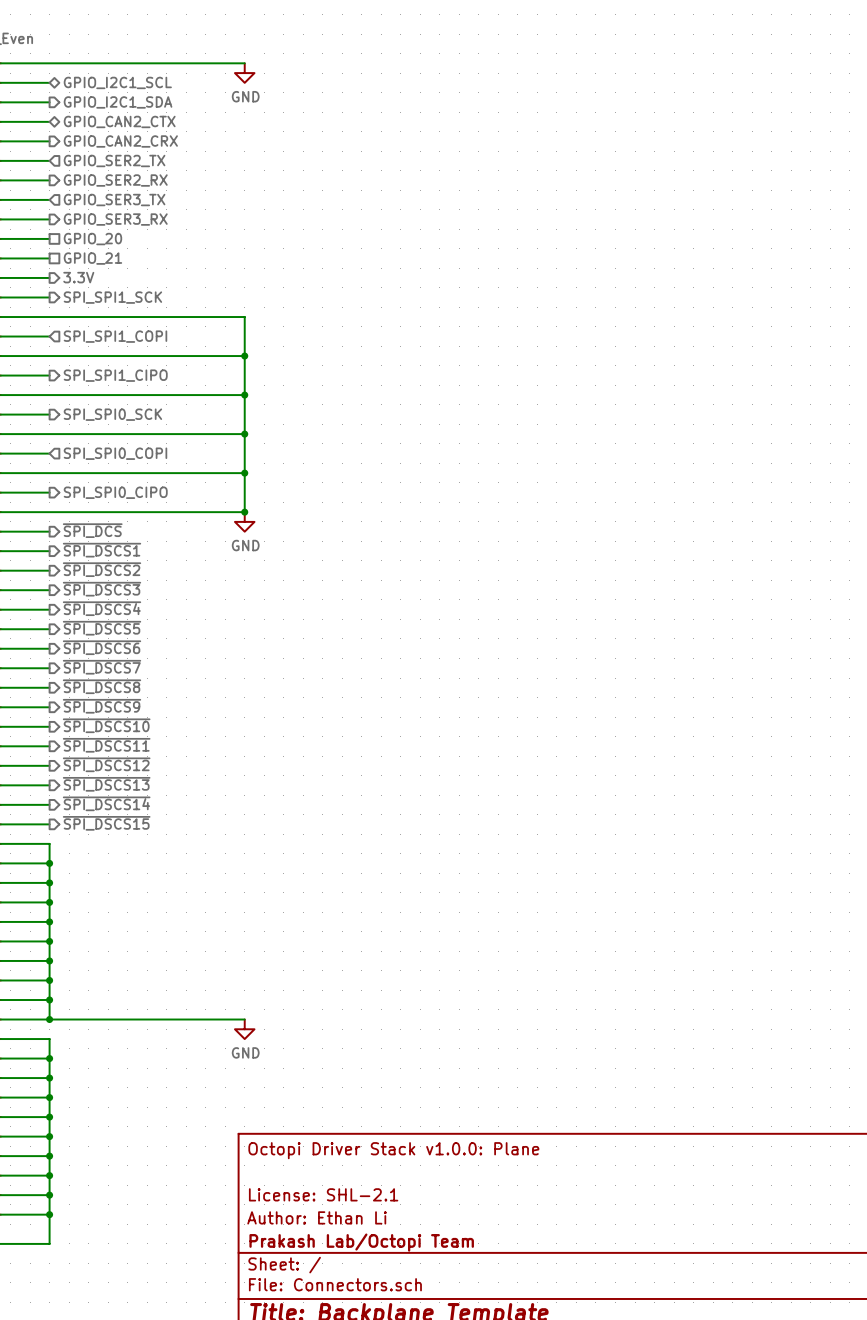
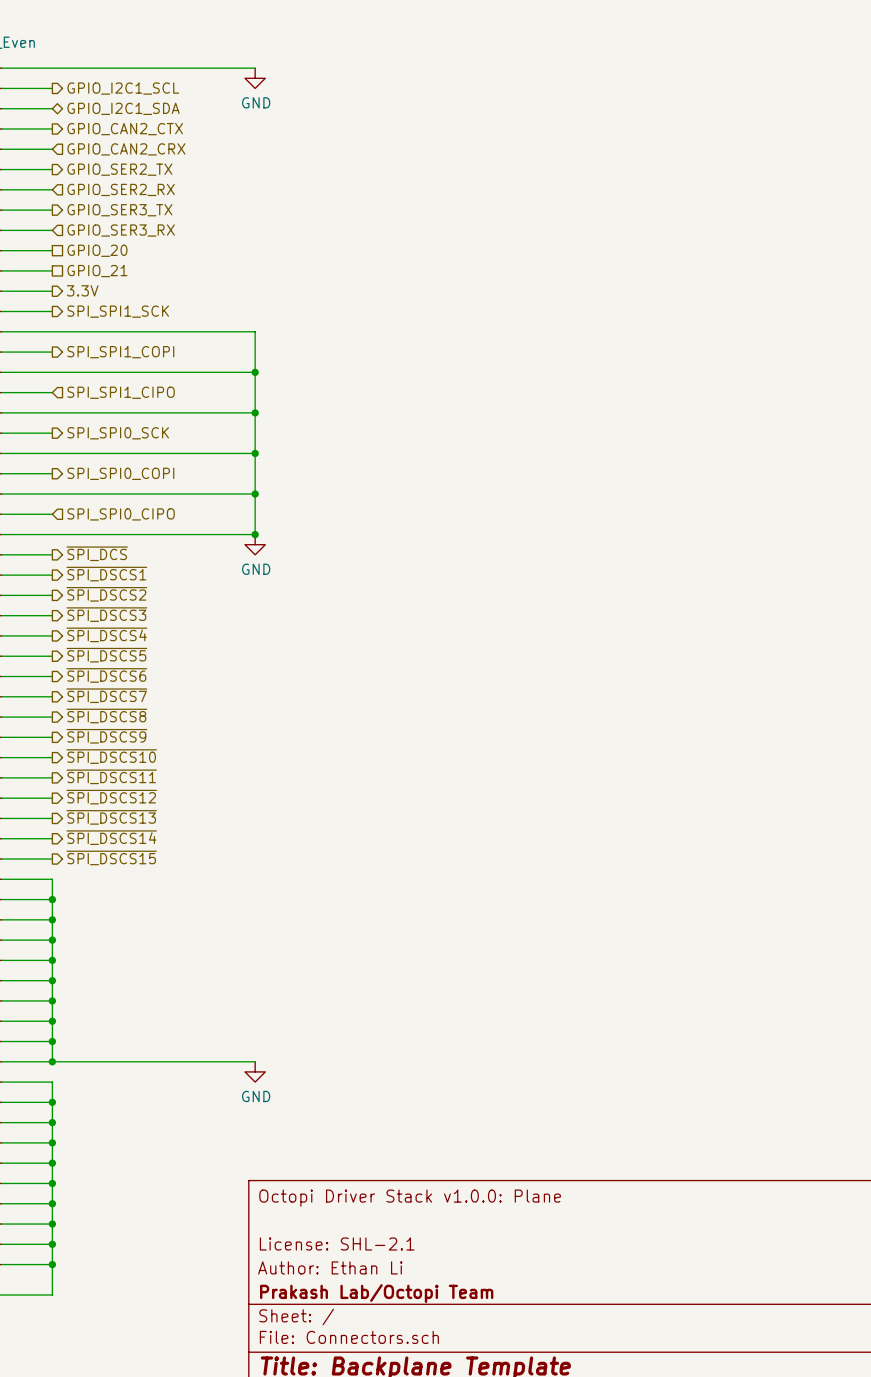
hierarchical label shape: bidirectional (117, 82) -> output (123, 88)
hierarchical label shape: output (118, 102) -> bidirectional (123, 108)
hierarchical label shape: bidirectional (119, 121) -> output (125, 129)
hierarchical label shape: output (120, 141) -> input (126, 149)
hierarchical label shape: input (114, 160) -> output (119, 169)
hierarchical label shape: output (115, 180) -> input (121, 189)
hierarchical label shape: input (114, 200) -> output (119, 210)
hierarchical label shape: output (115, 219) -> input (121, 230)
hierarchical label shape: input (115, 336) -> output (120, 352)
hierarchical label shape: output (115, 375) -> input (121, 392)
hierarchical label shape: input (115, 453) -> output (120, 473)
hierarchical label shape: output (115, 492) -> input (121, 514)

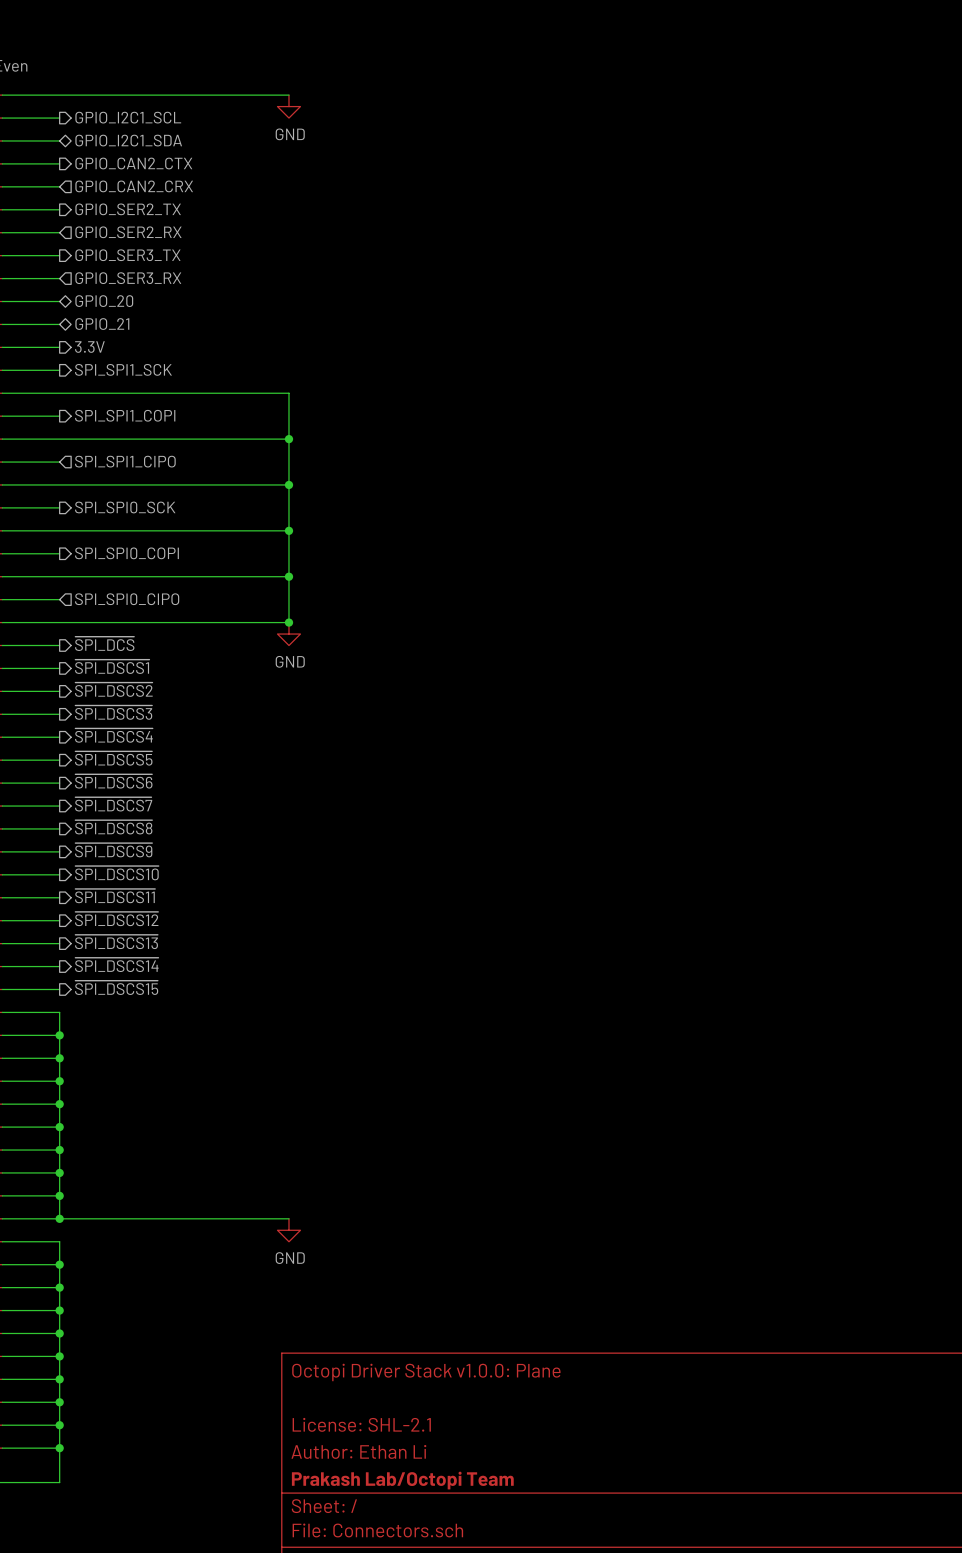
hierarchical label shape: passive (97, 250) -> bidirectional (104, 301)
hierarchical label shape: passive (97, 271) -> bidirectional (102, 324)

